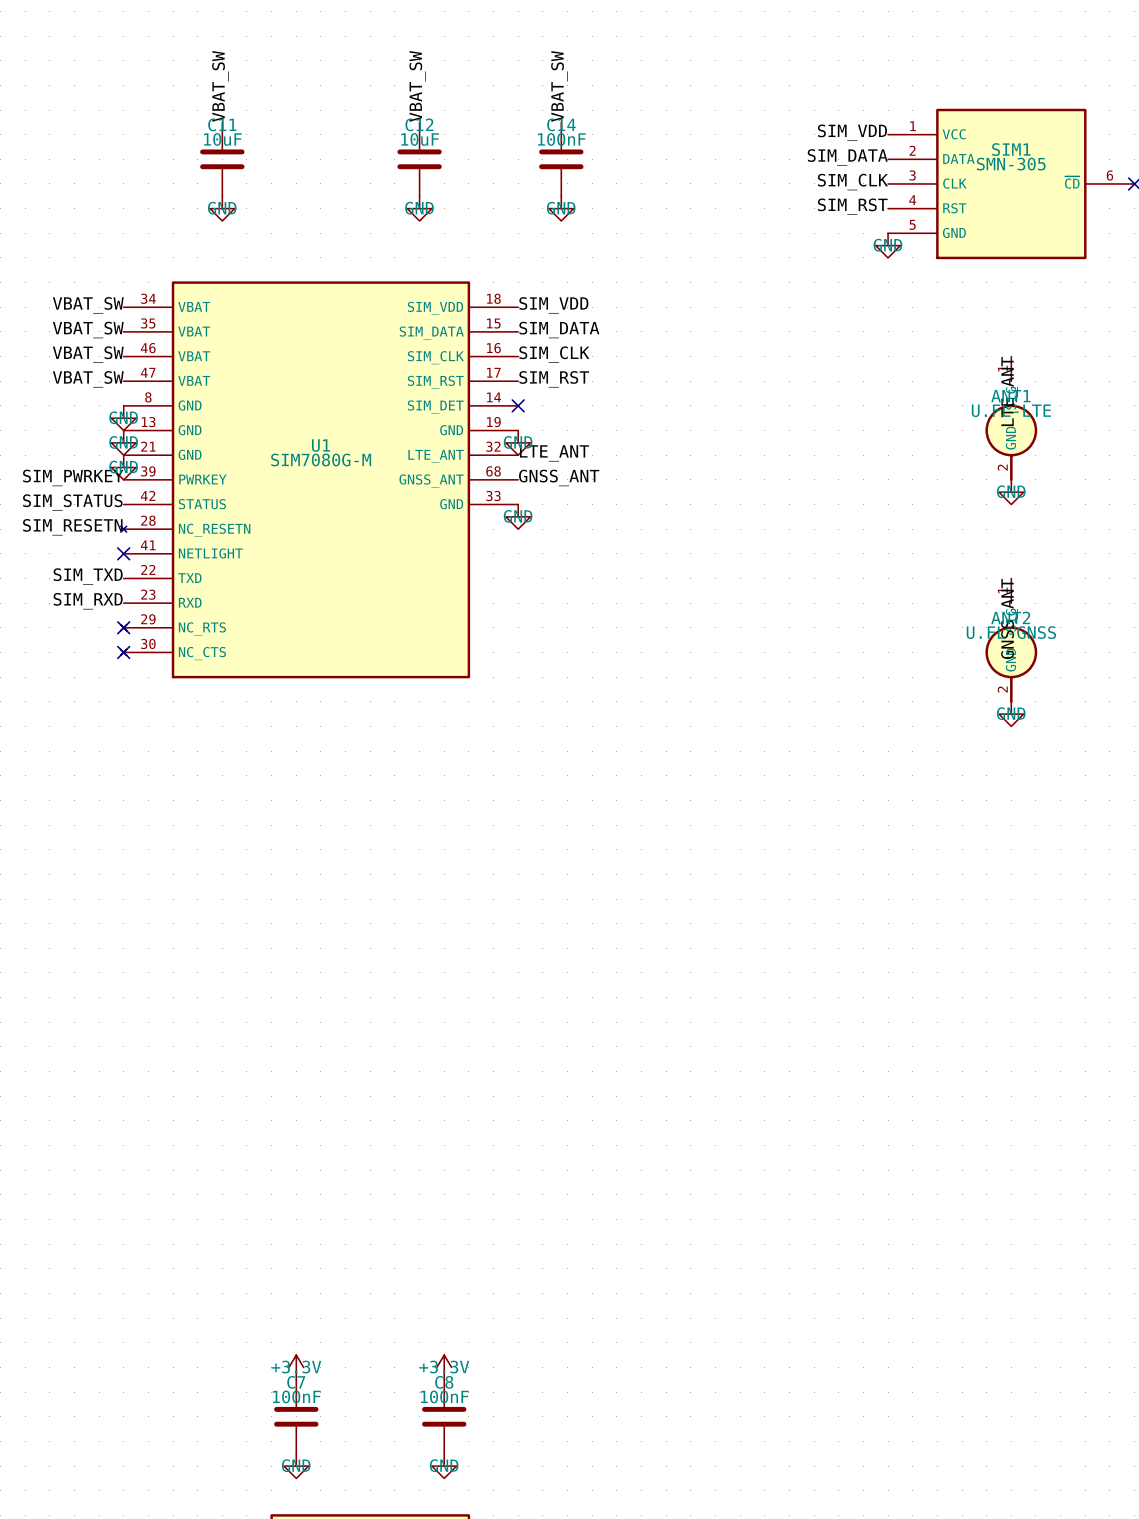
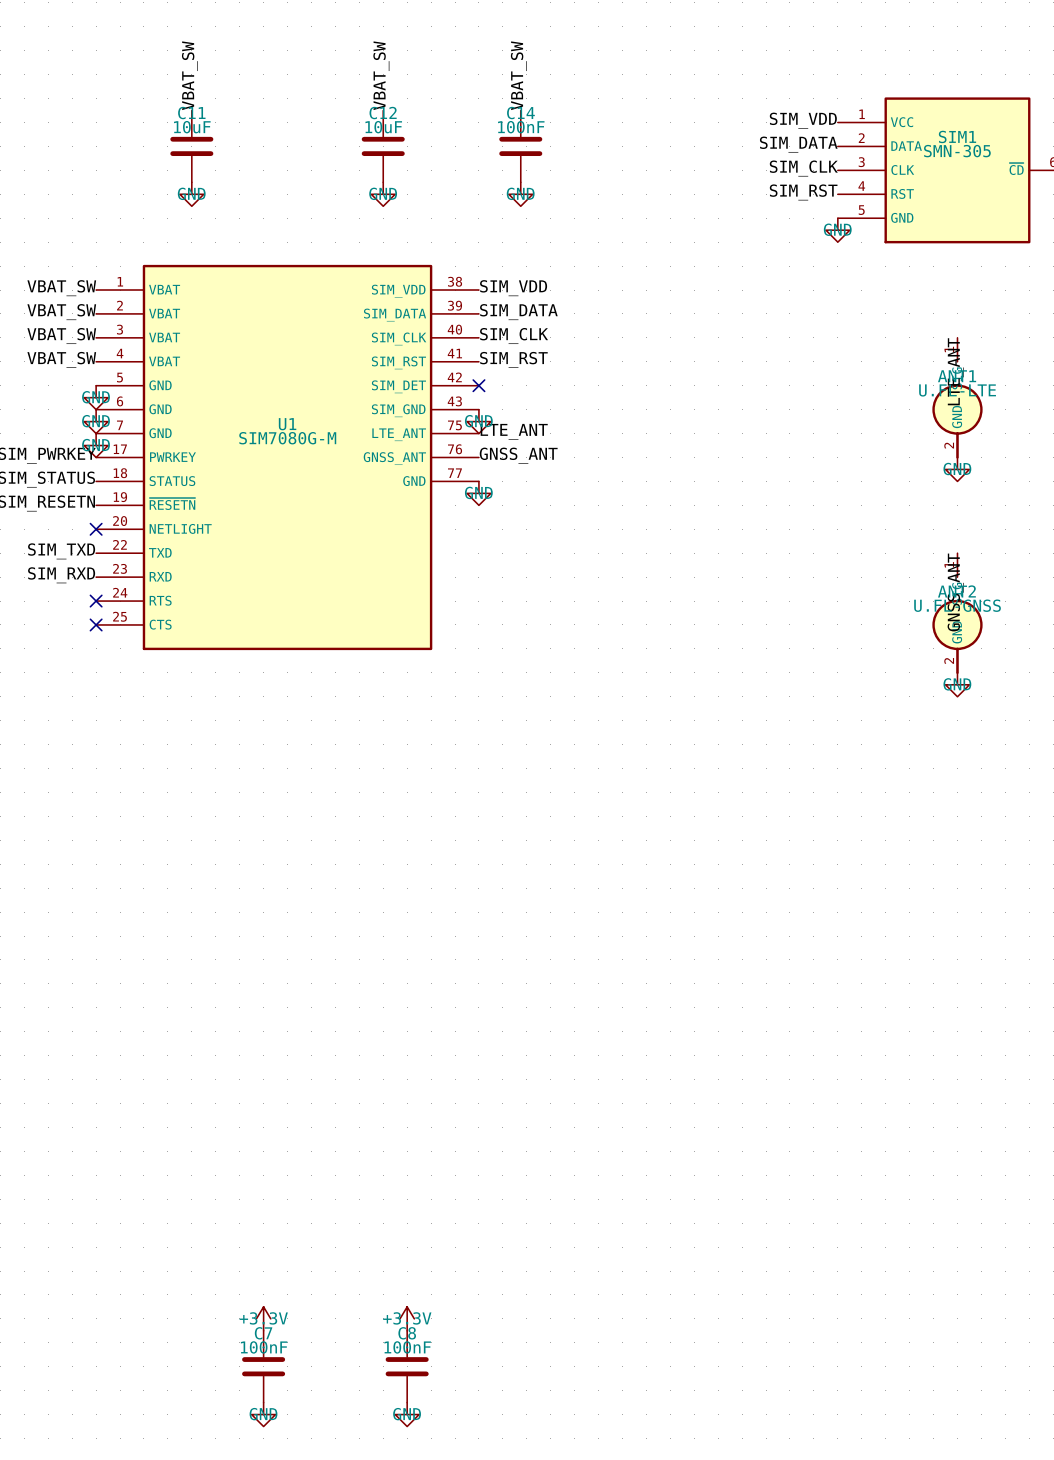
U1 symbol: [120, 281, 519, 679] -> [96, 264, 479, 651]

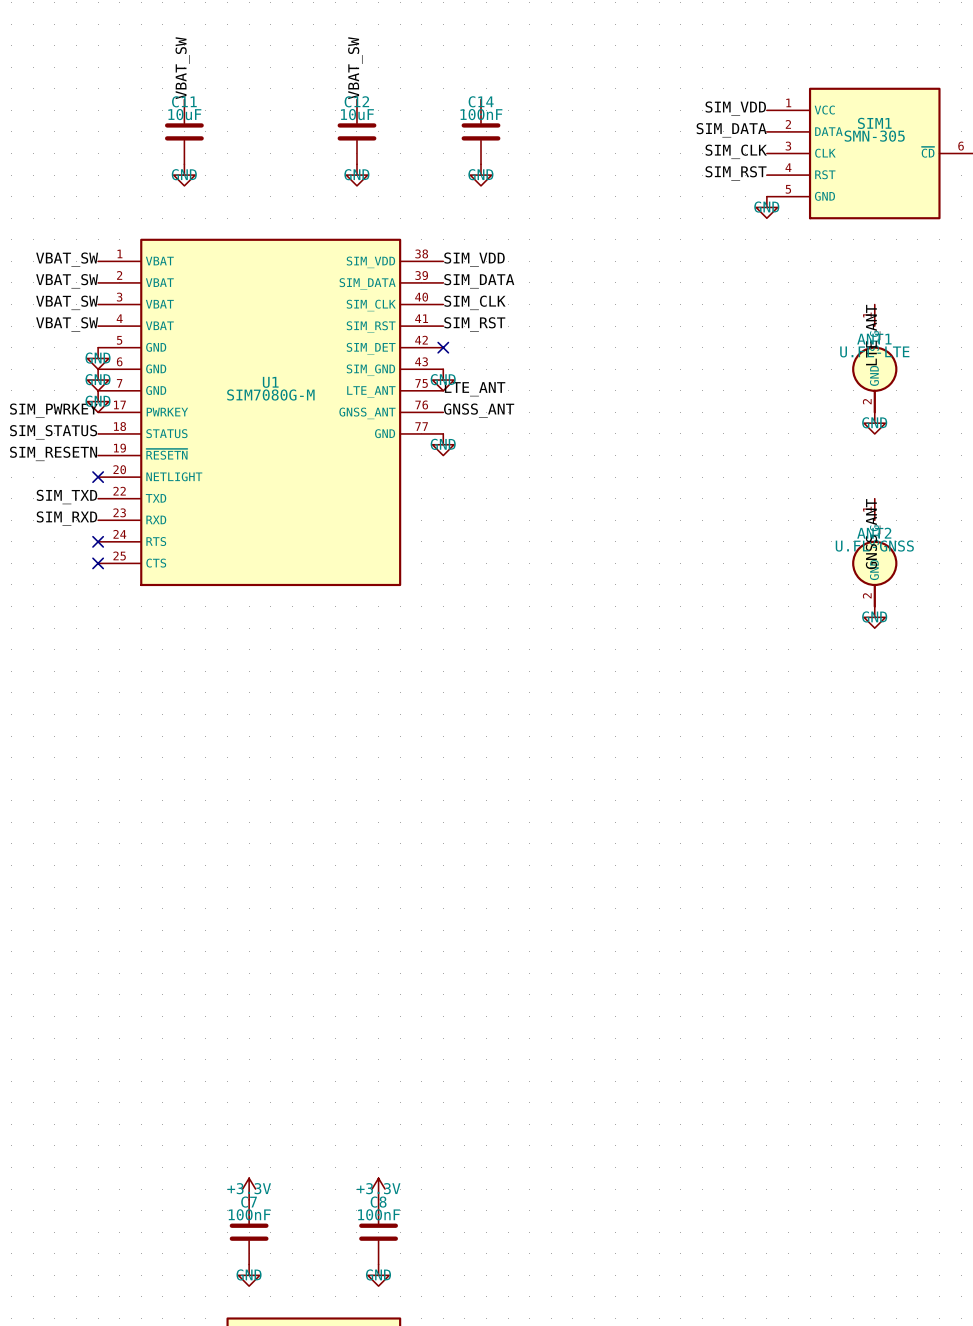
label: VBAT_SW (518, 75) -> none

